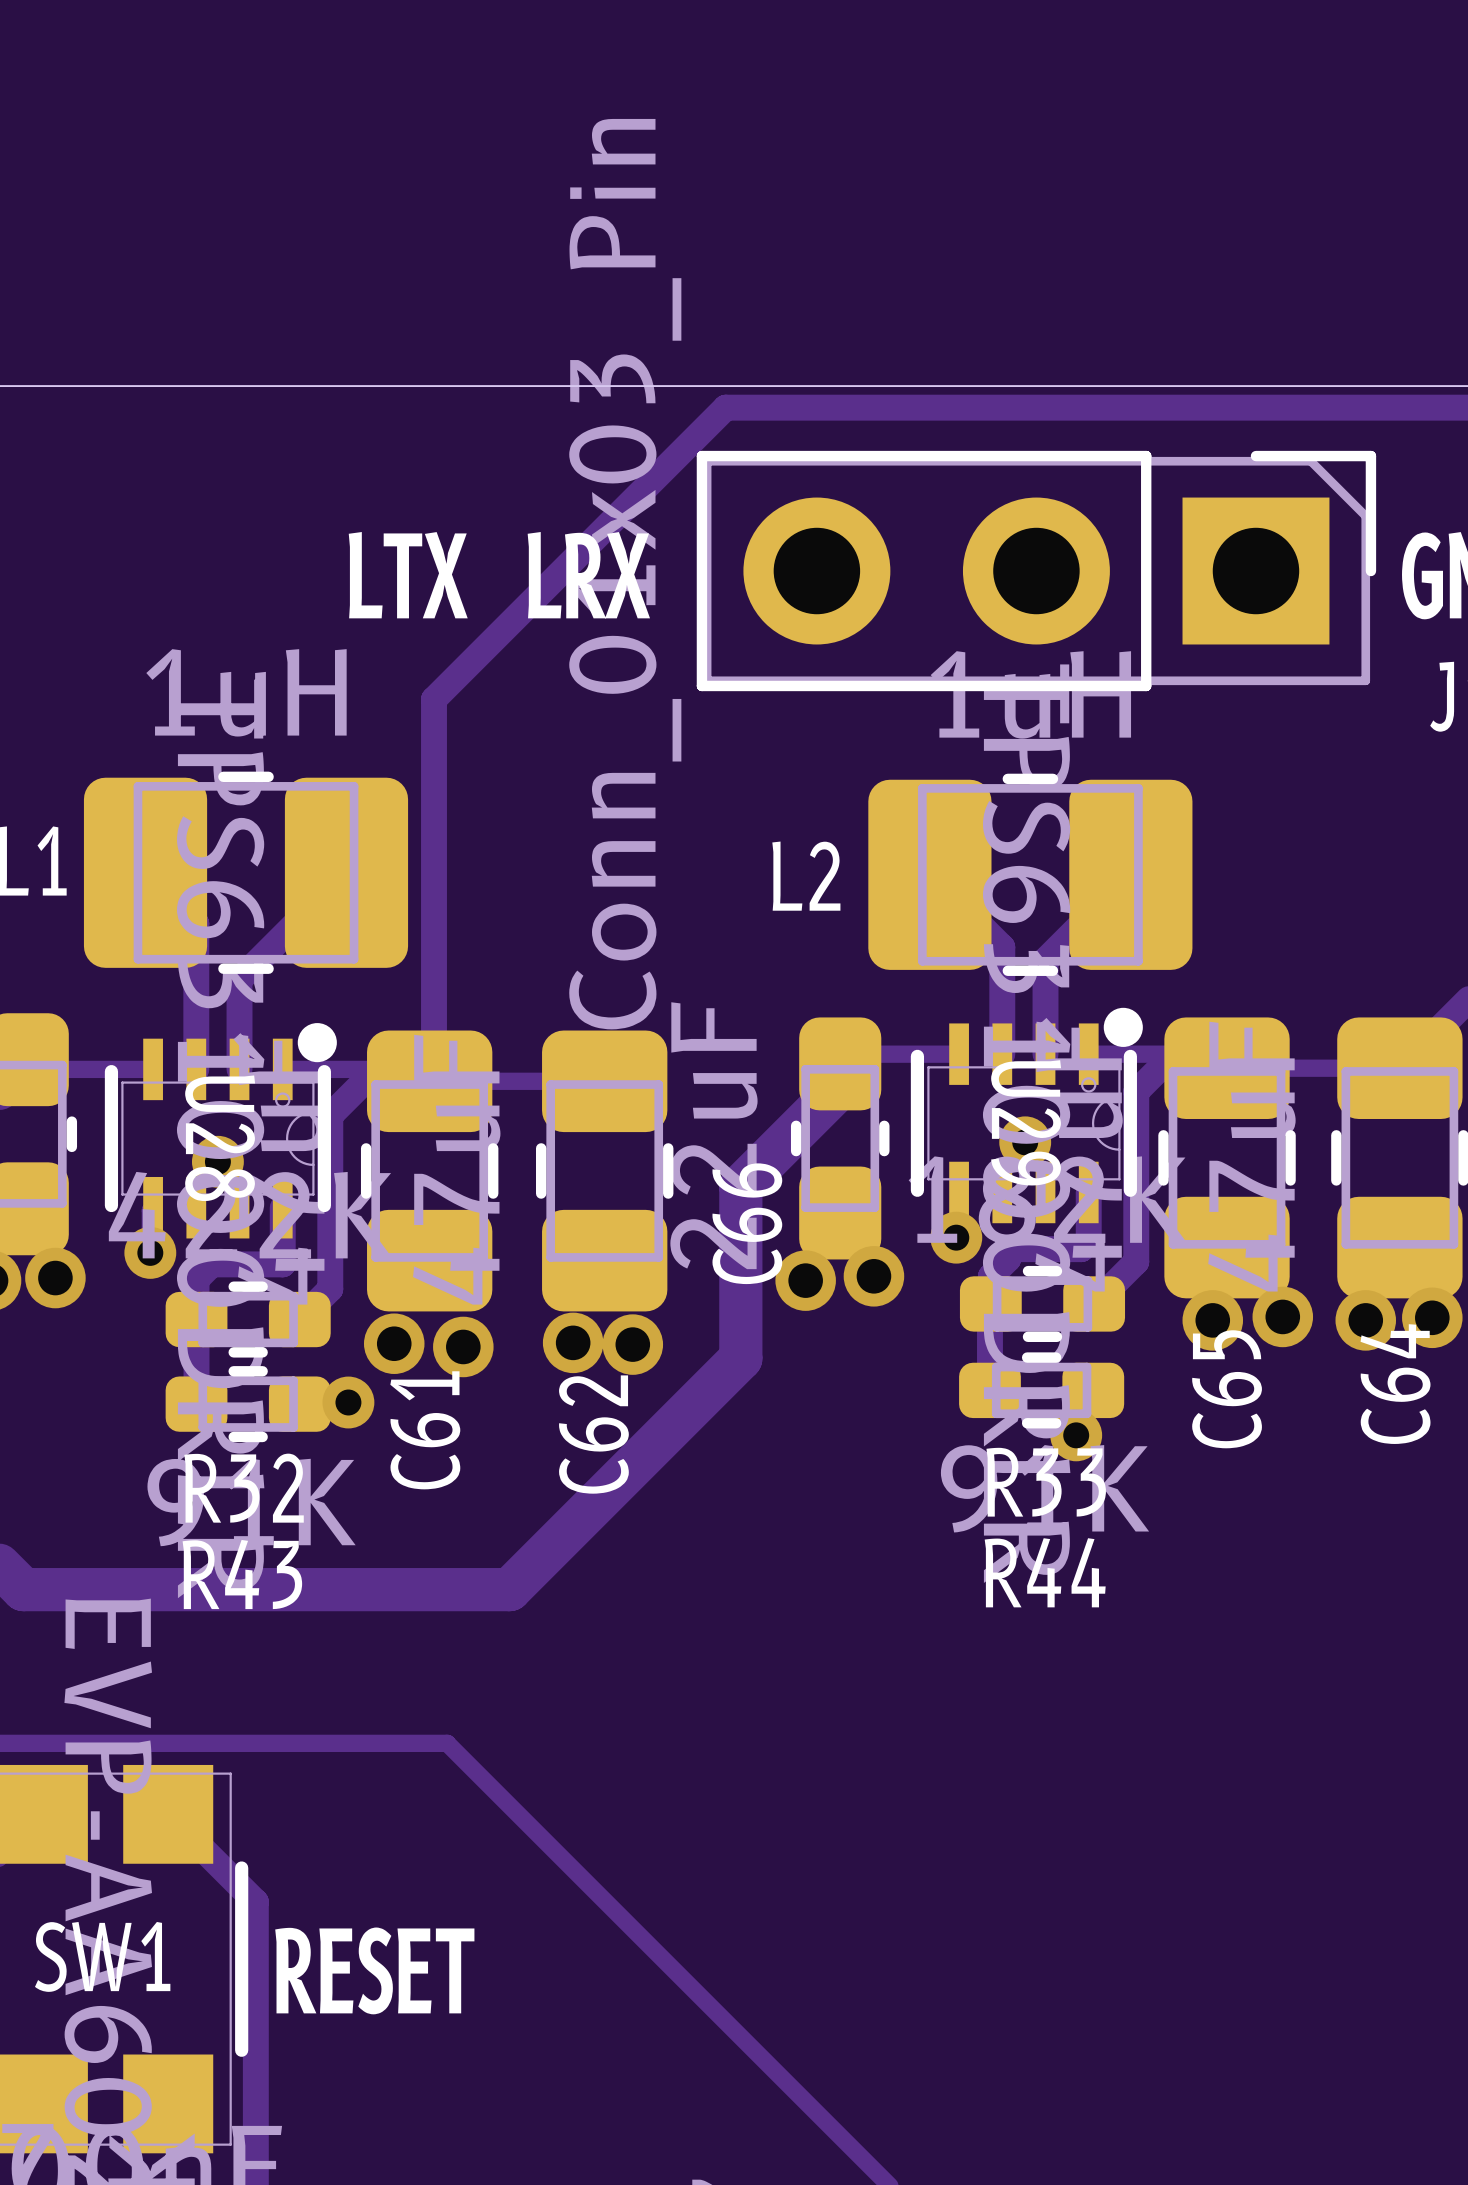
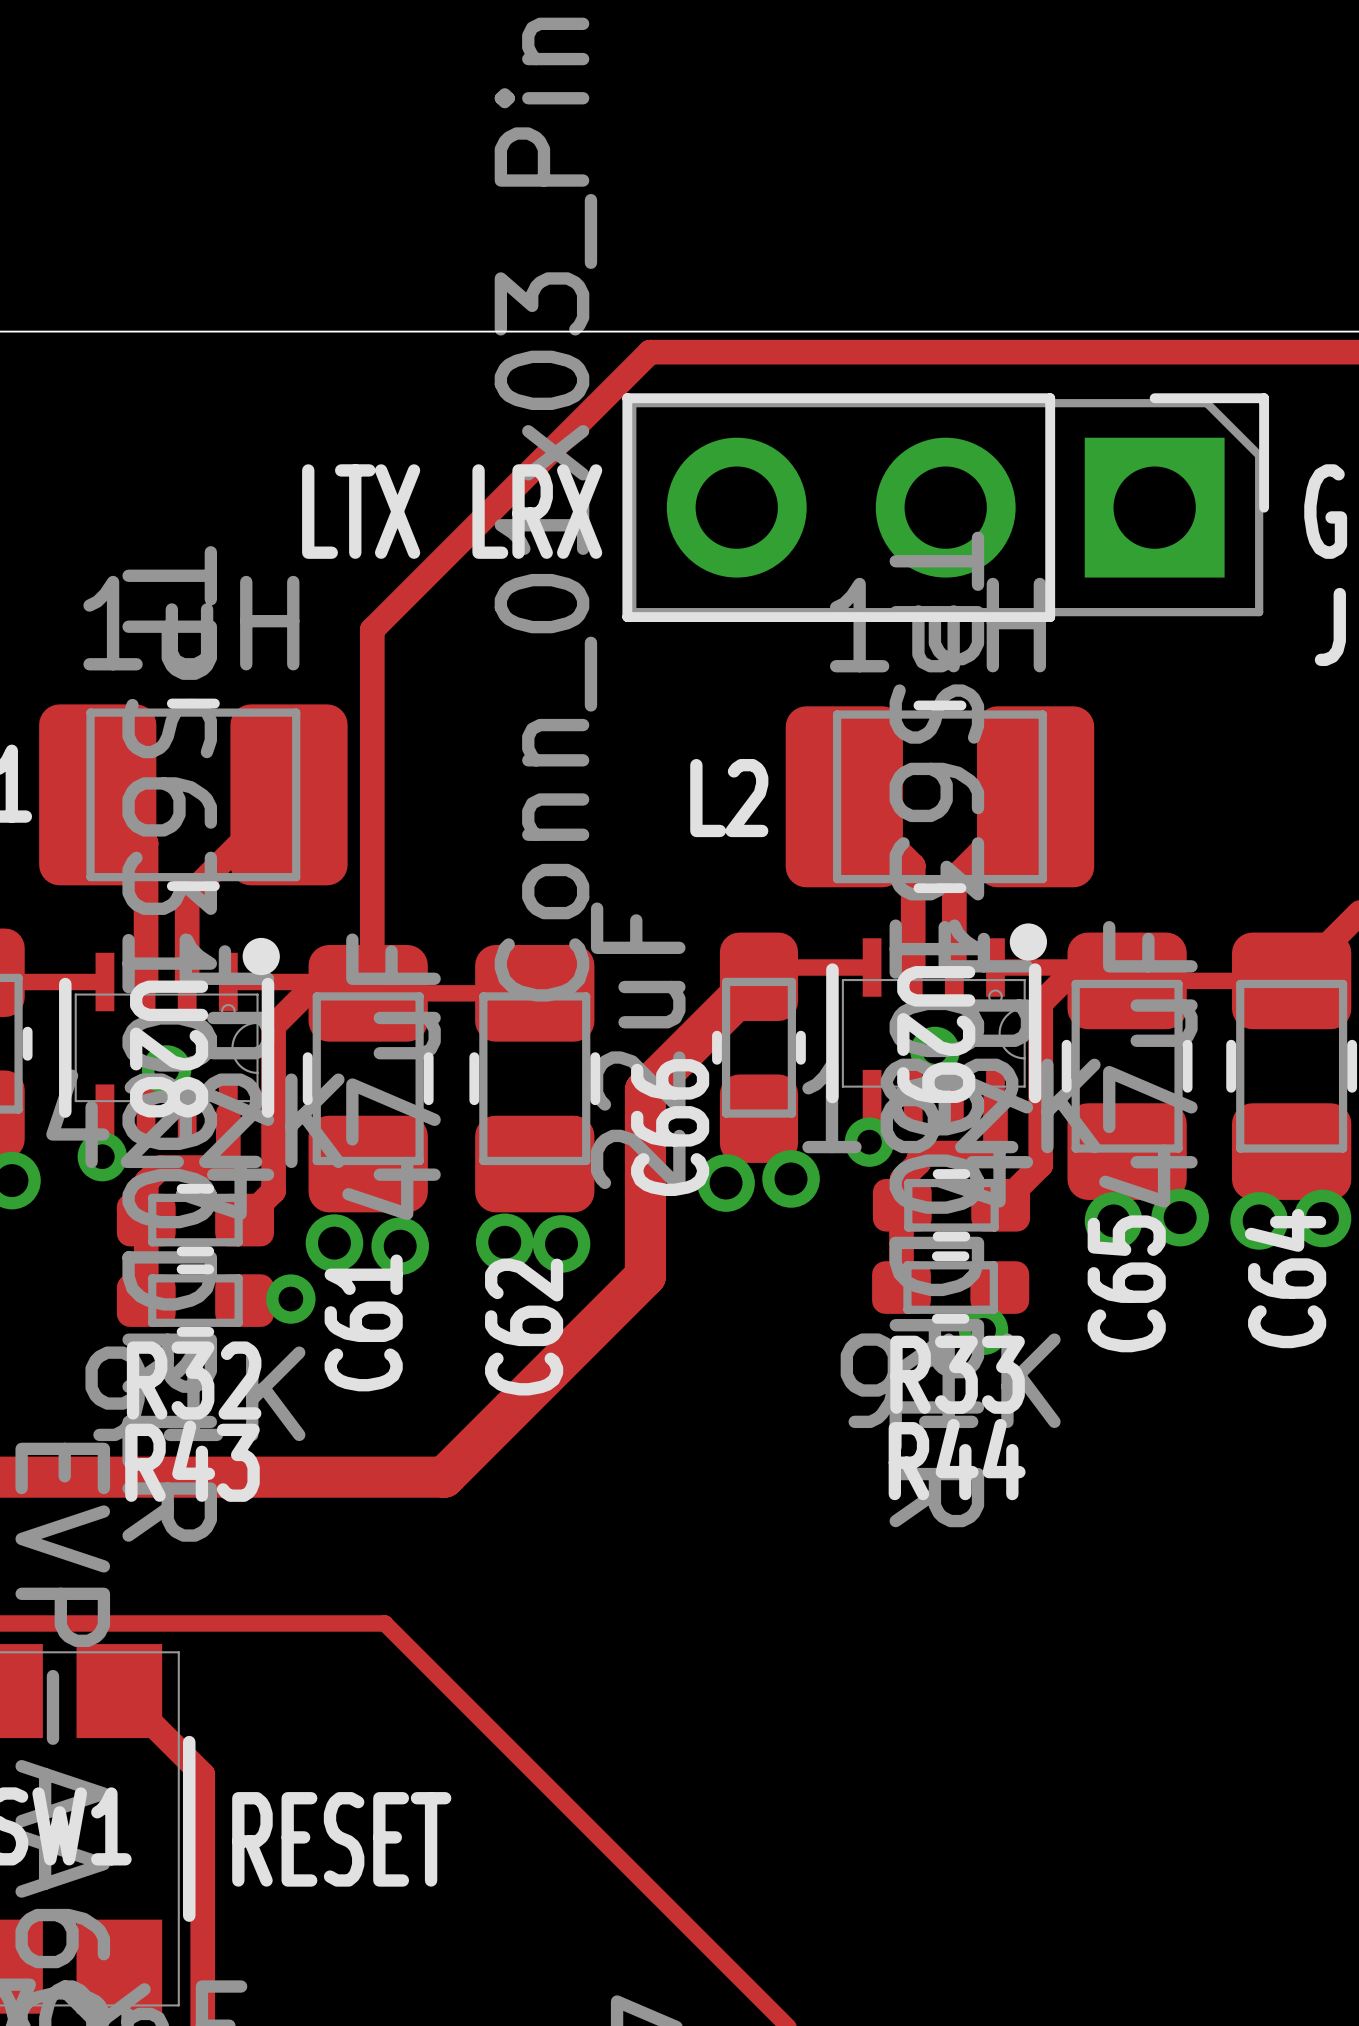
track: (840, 1063) (840, 1087) (740, 1186) (740, 1358) (720, 1378) -> (758, 976) (645, 1090) (645, 1276)

